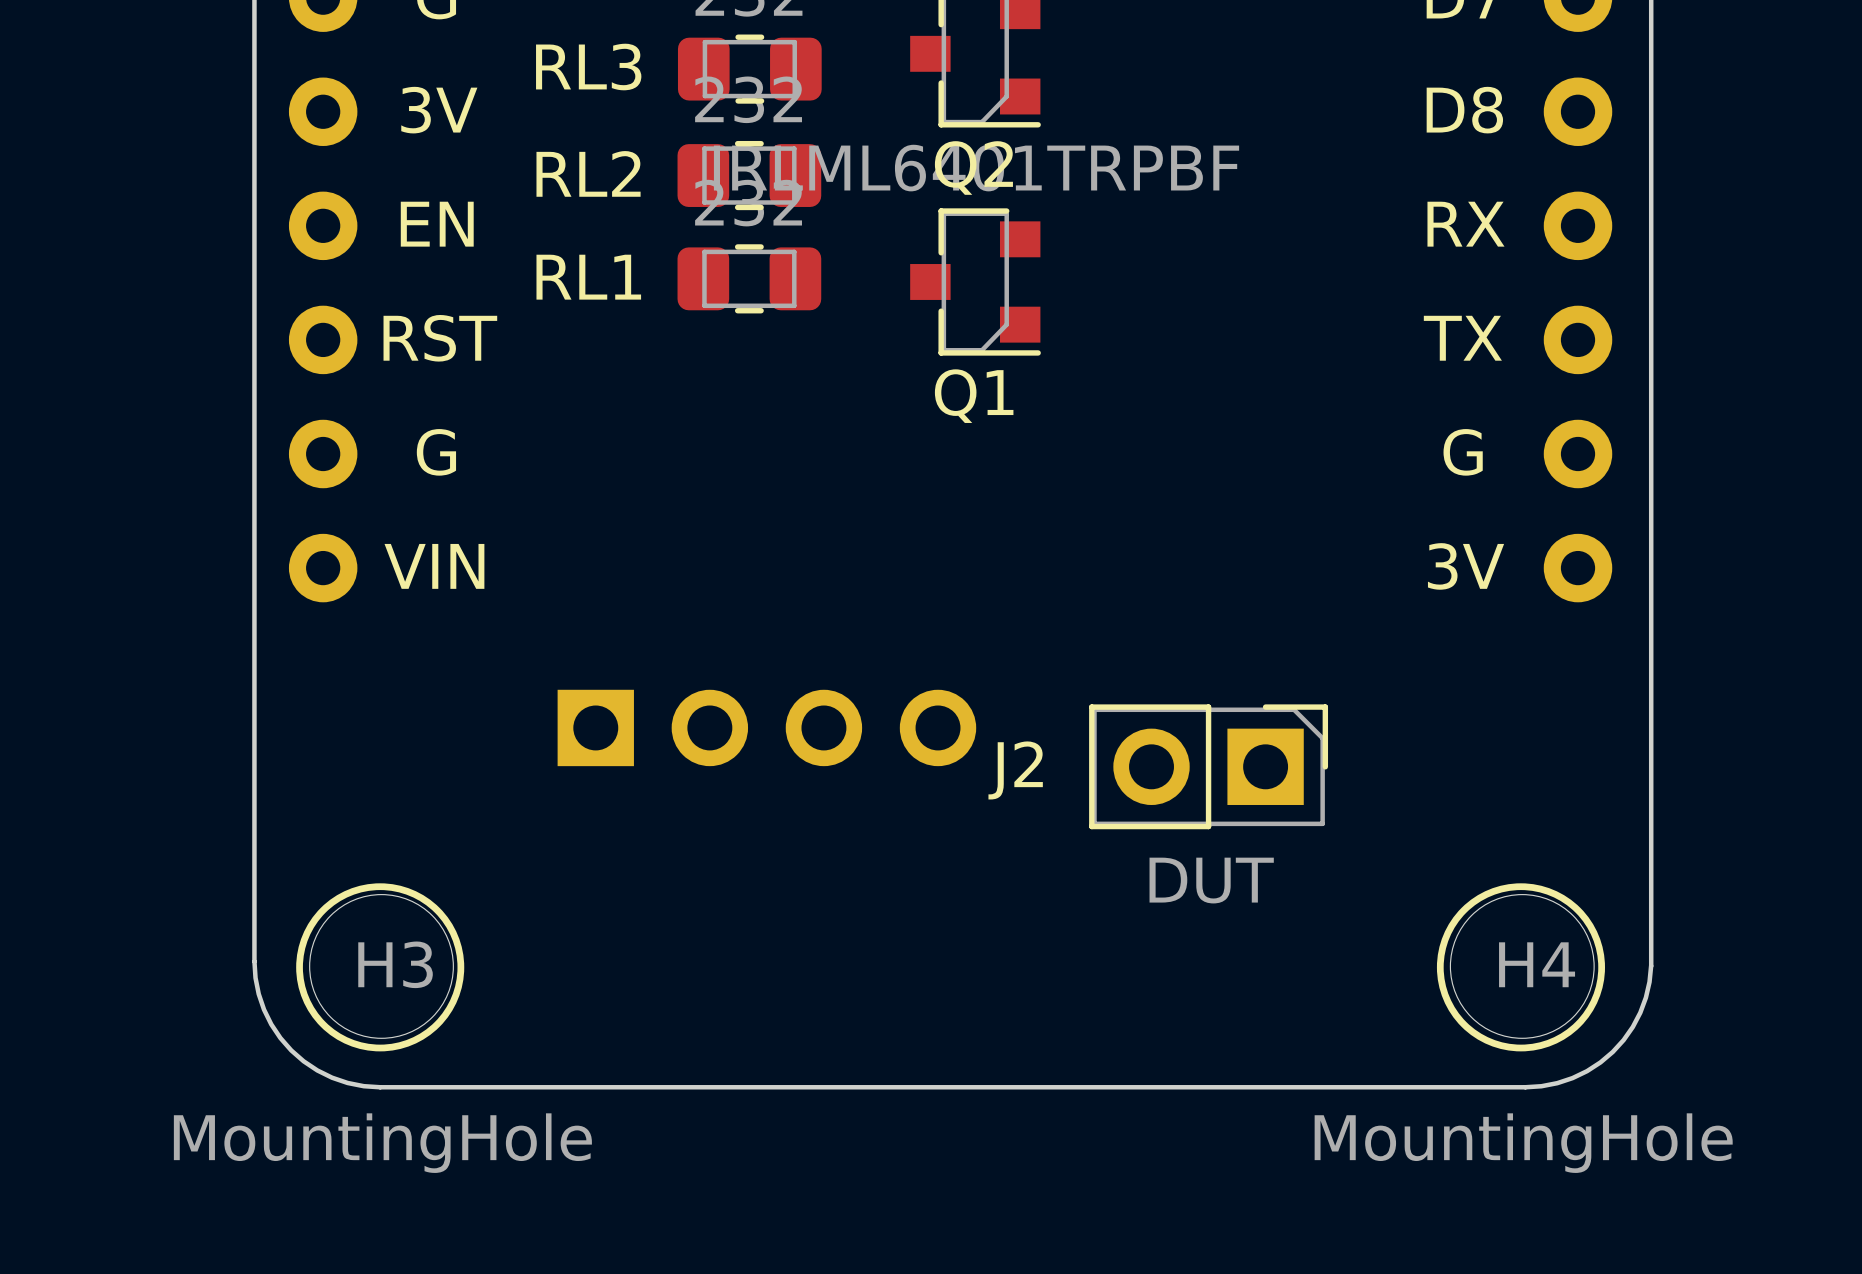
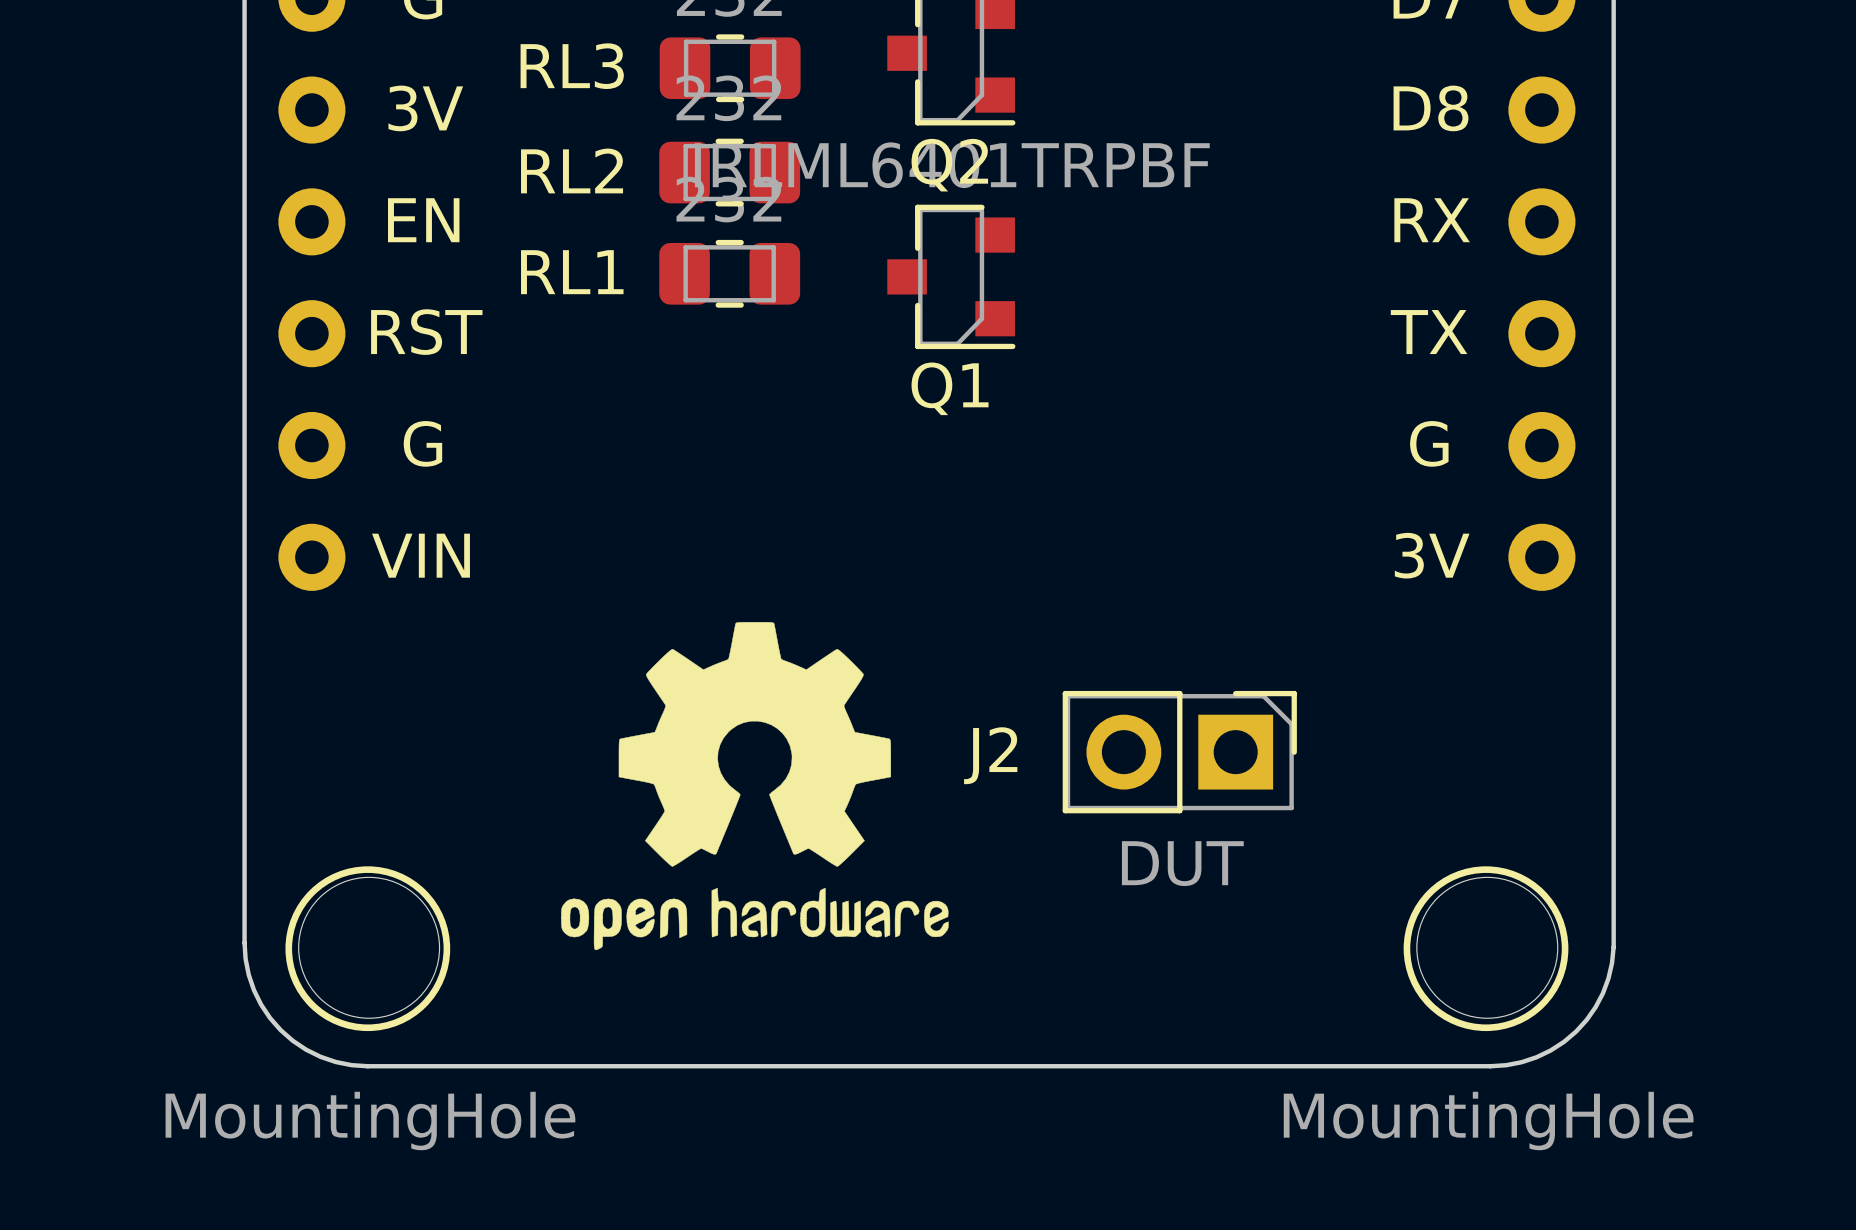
drawing: none -> [561, 622, 949, 951]
part: (766, 727) -> none
H3 name: H3 (395, 964) -> none
H4 name: H4 (1537, 964) -> none

